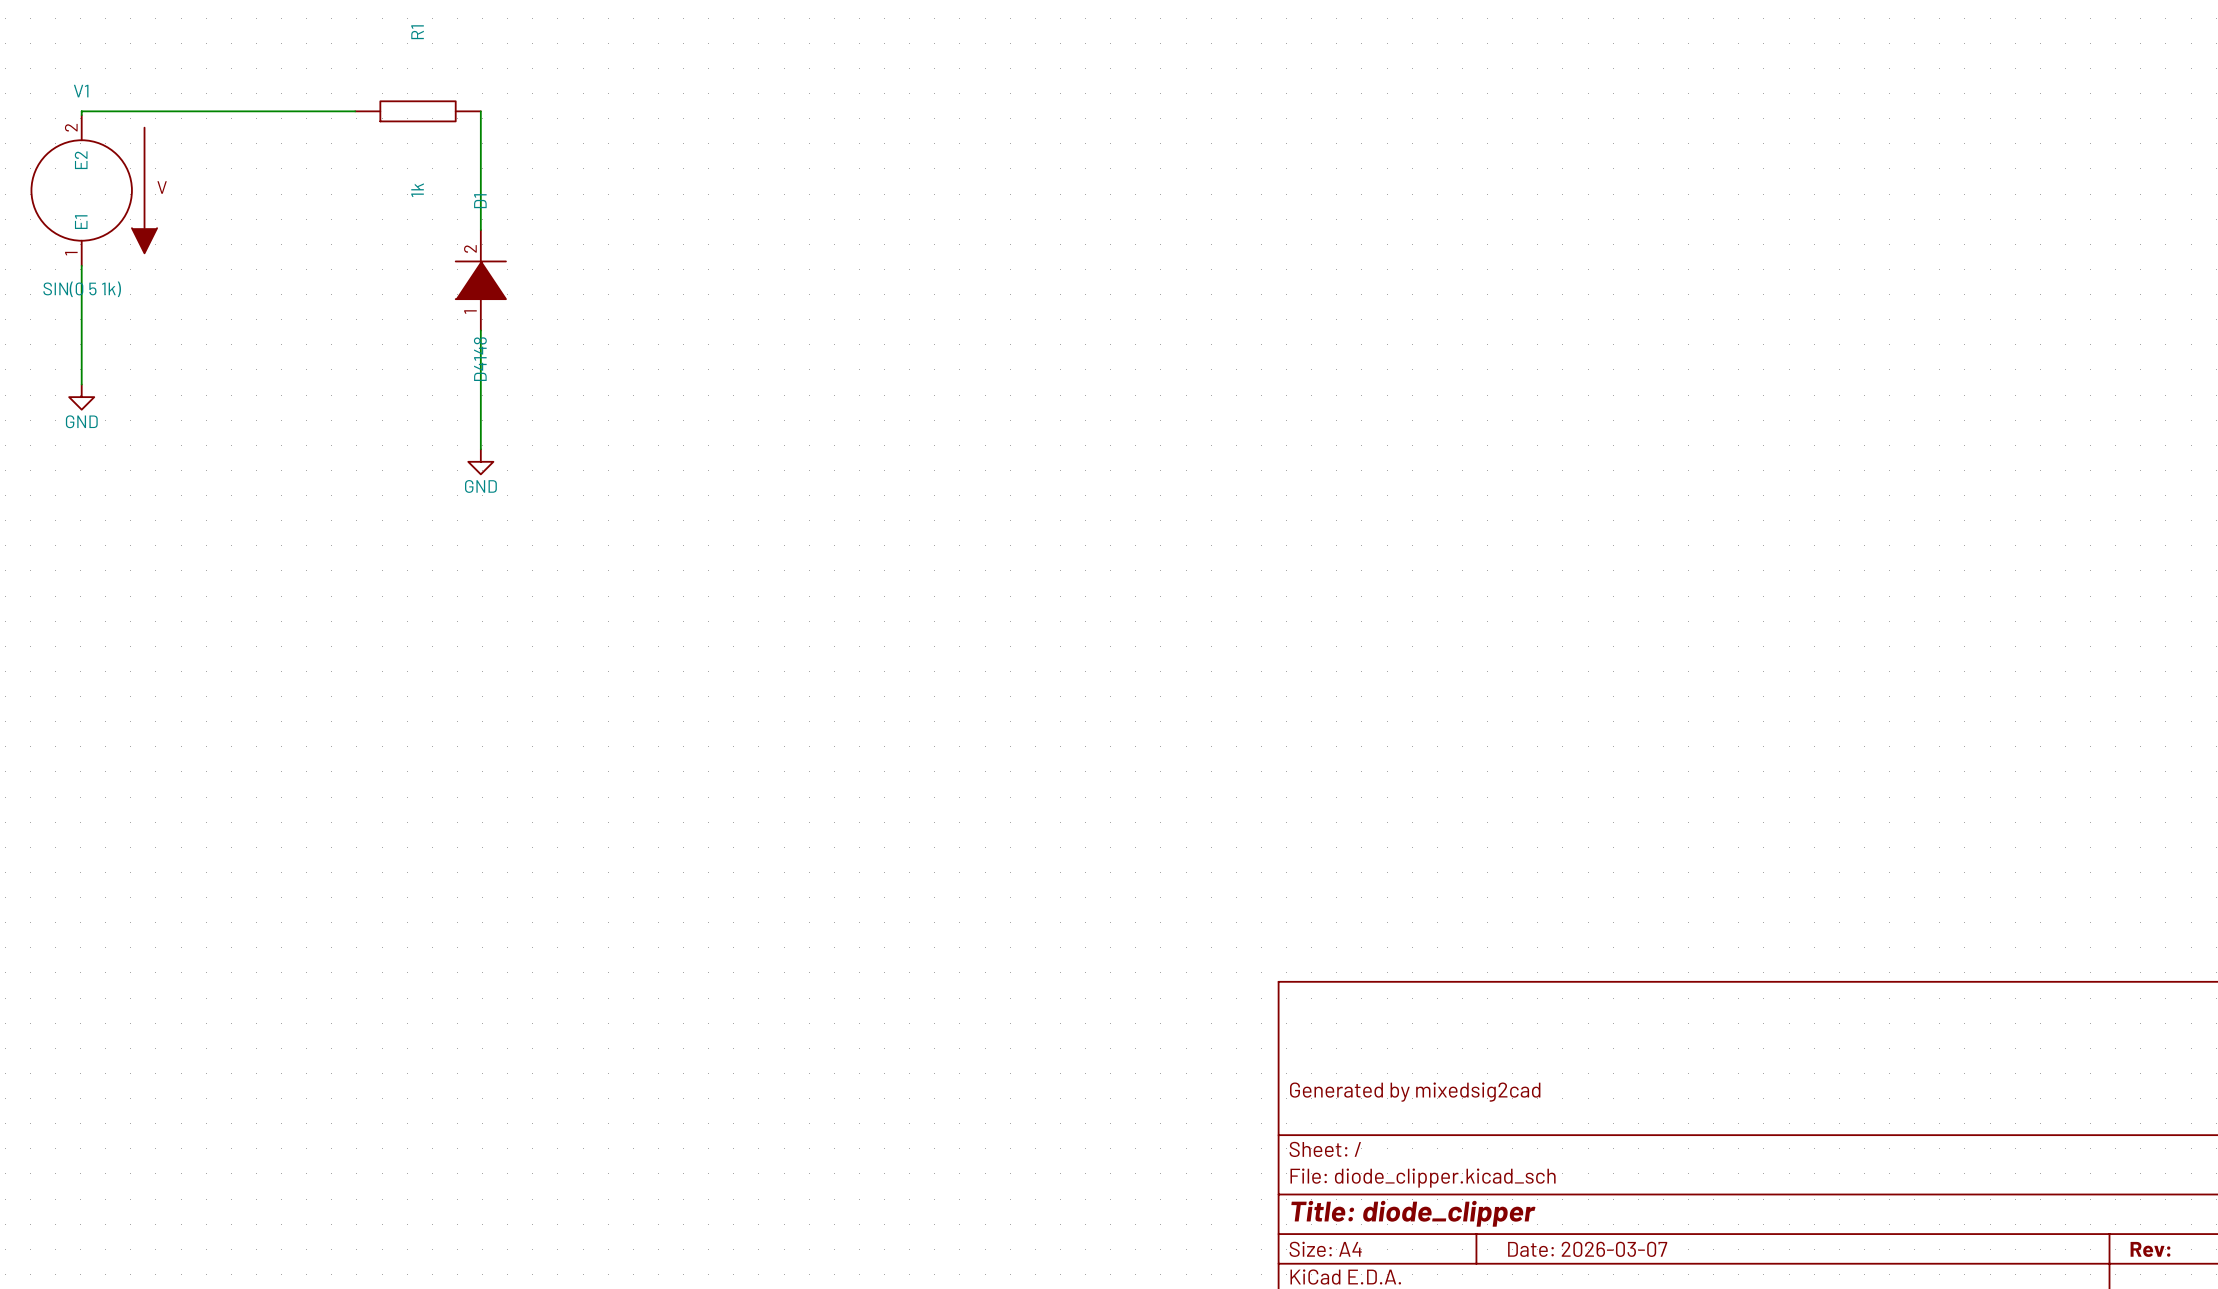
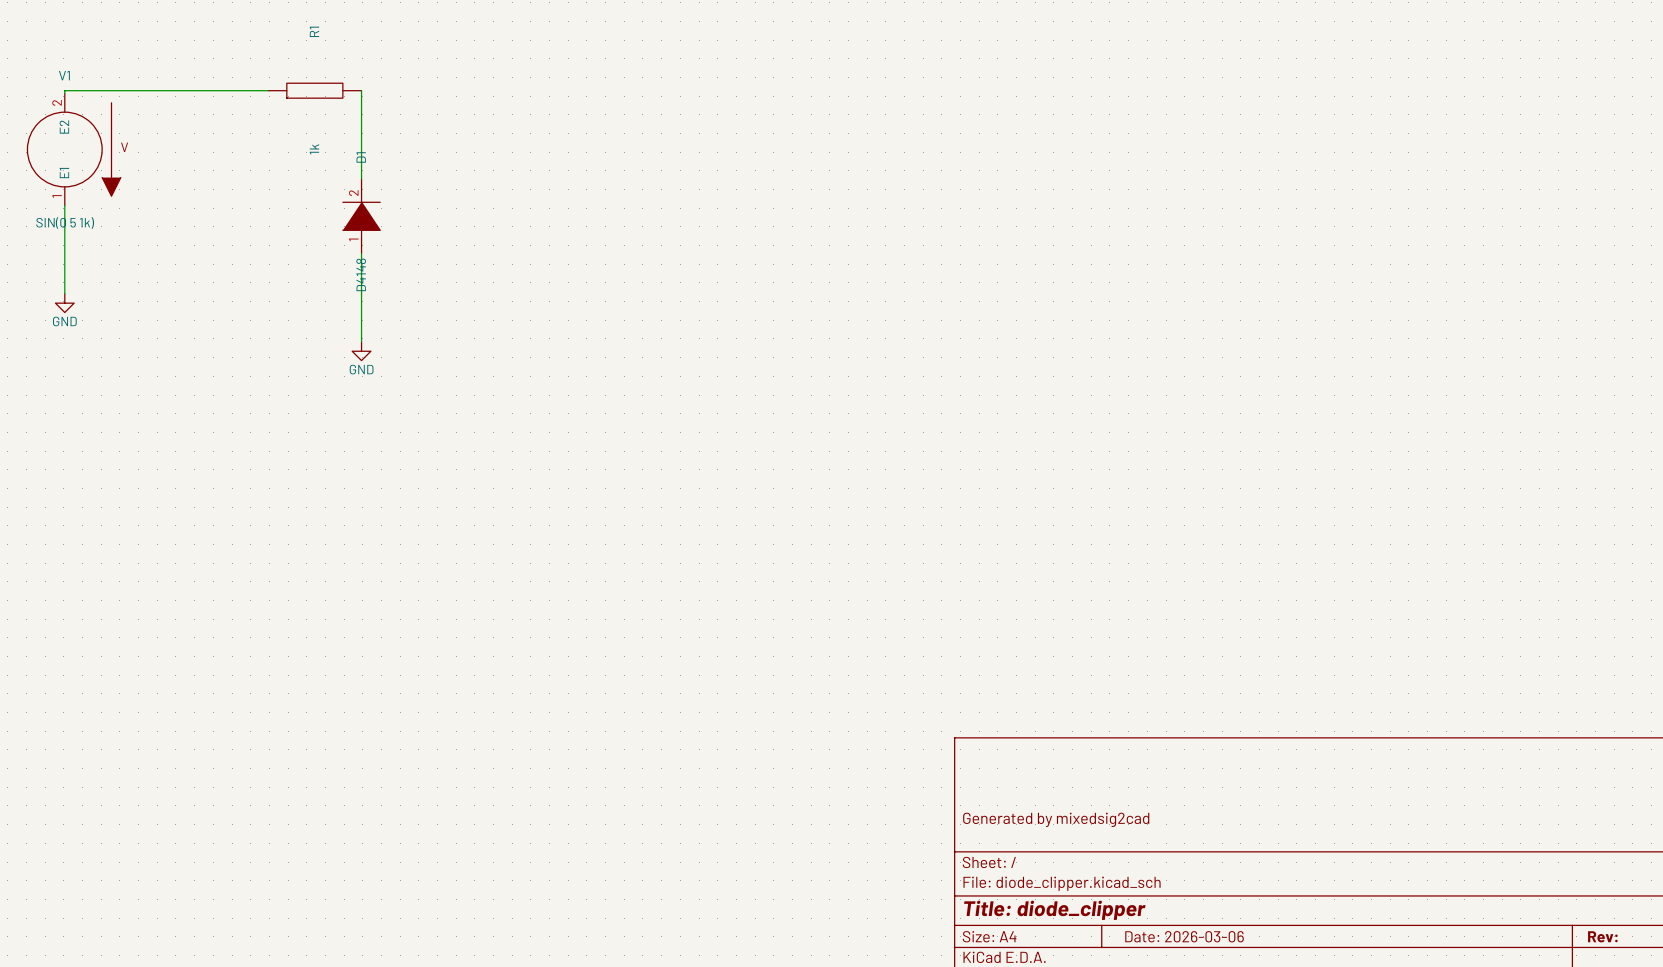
title block: Date: 2026-03-07 (1587, 1249) -> Date: 2026-03-06 (1184, 936)

